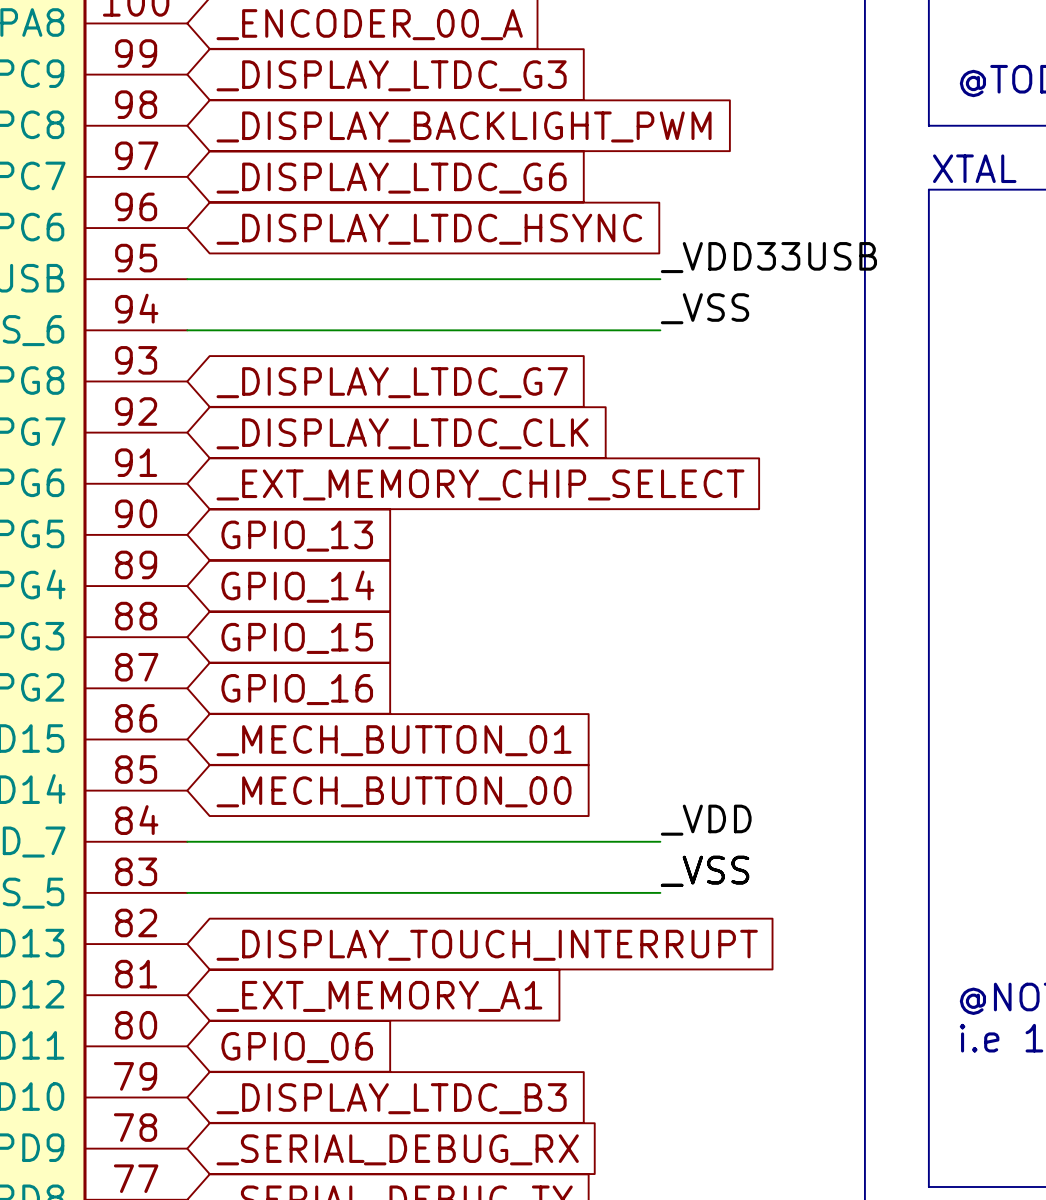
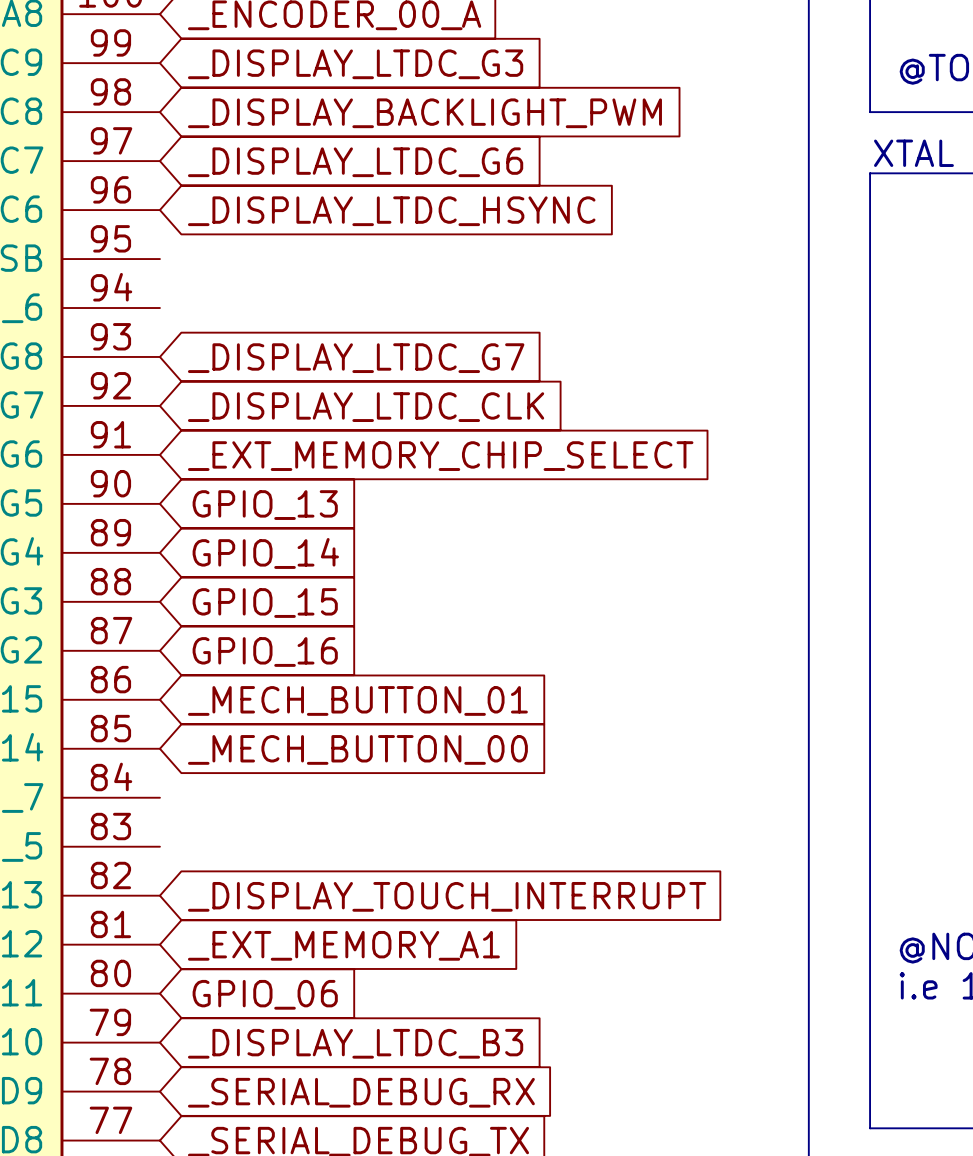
label: _VDD33USB (768, 257) -> none
wire: (187, 279) (660, 279) -> none
label: _VSS (705, 308) -> none
wire: (187, 330) (660, 330) -> none
label: _VDD (706, 820) -> none
wire: (187, 841) (660, 841) -> none
label: _VSS (705, 871) -> none
wire: (187, 892) (660, 892) -> none

